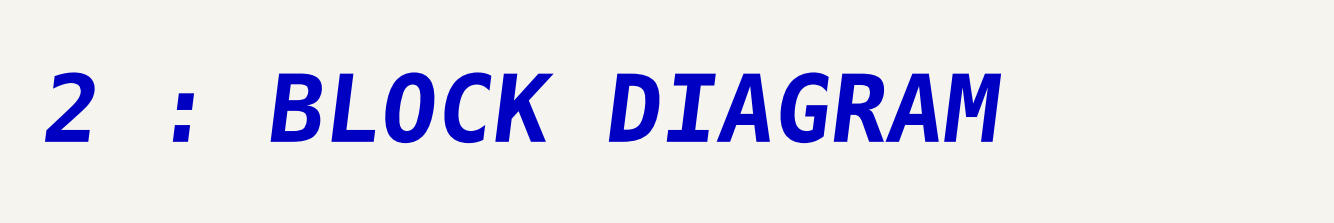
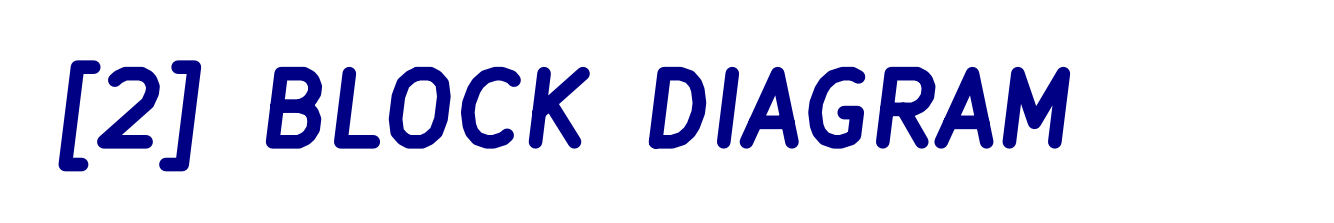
text: 2 : BLOCK DIAGRAM (523, 107) -> [2] BLOCK DIAGRAM (564, 115)

